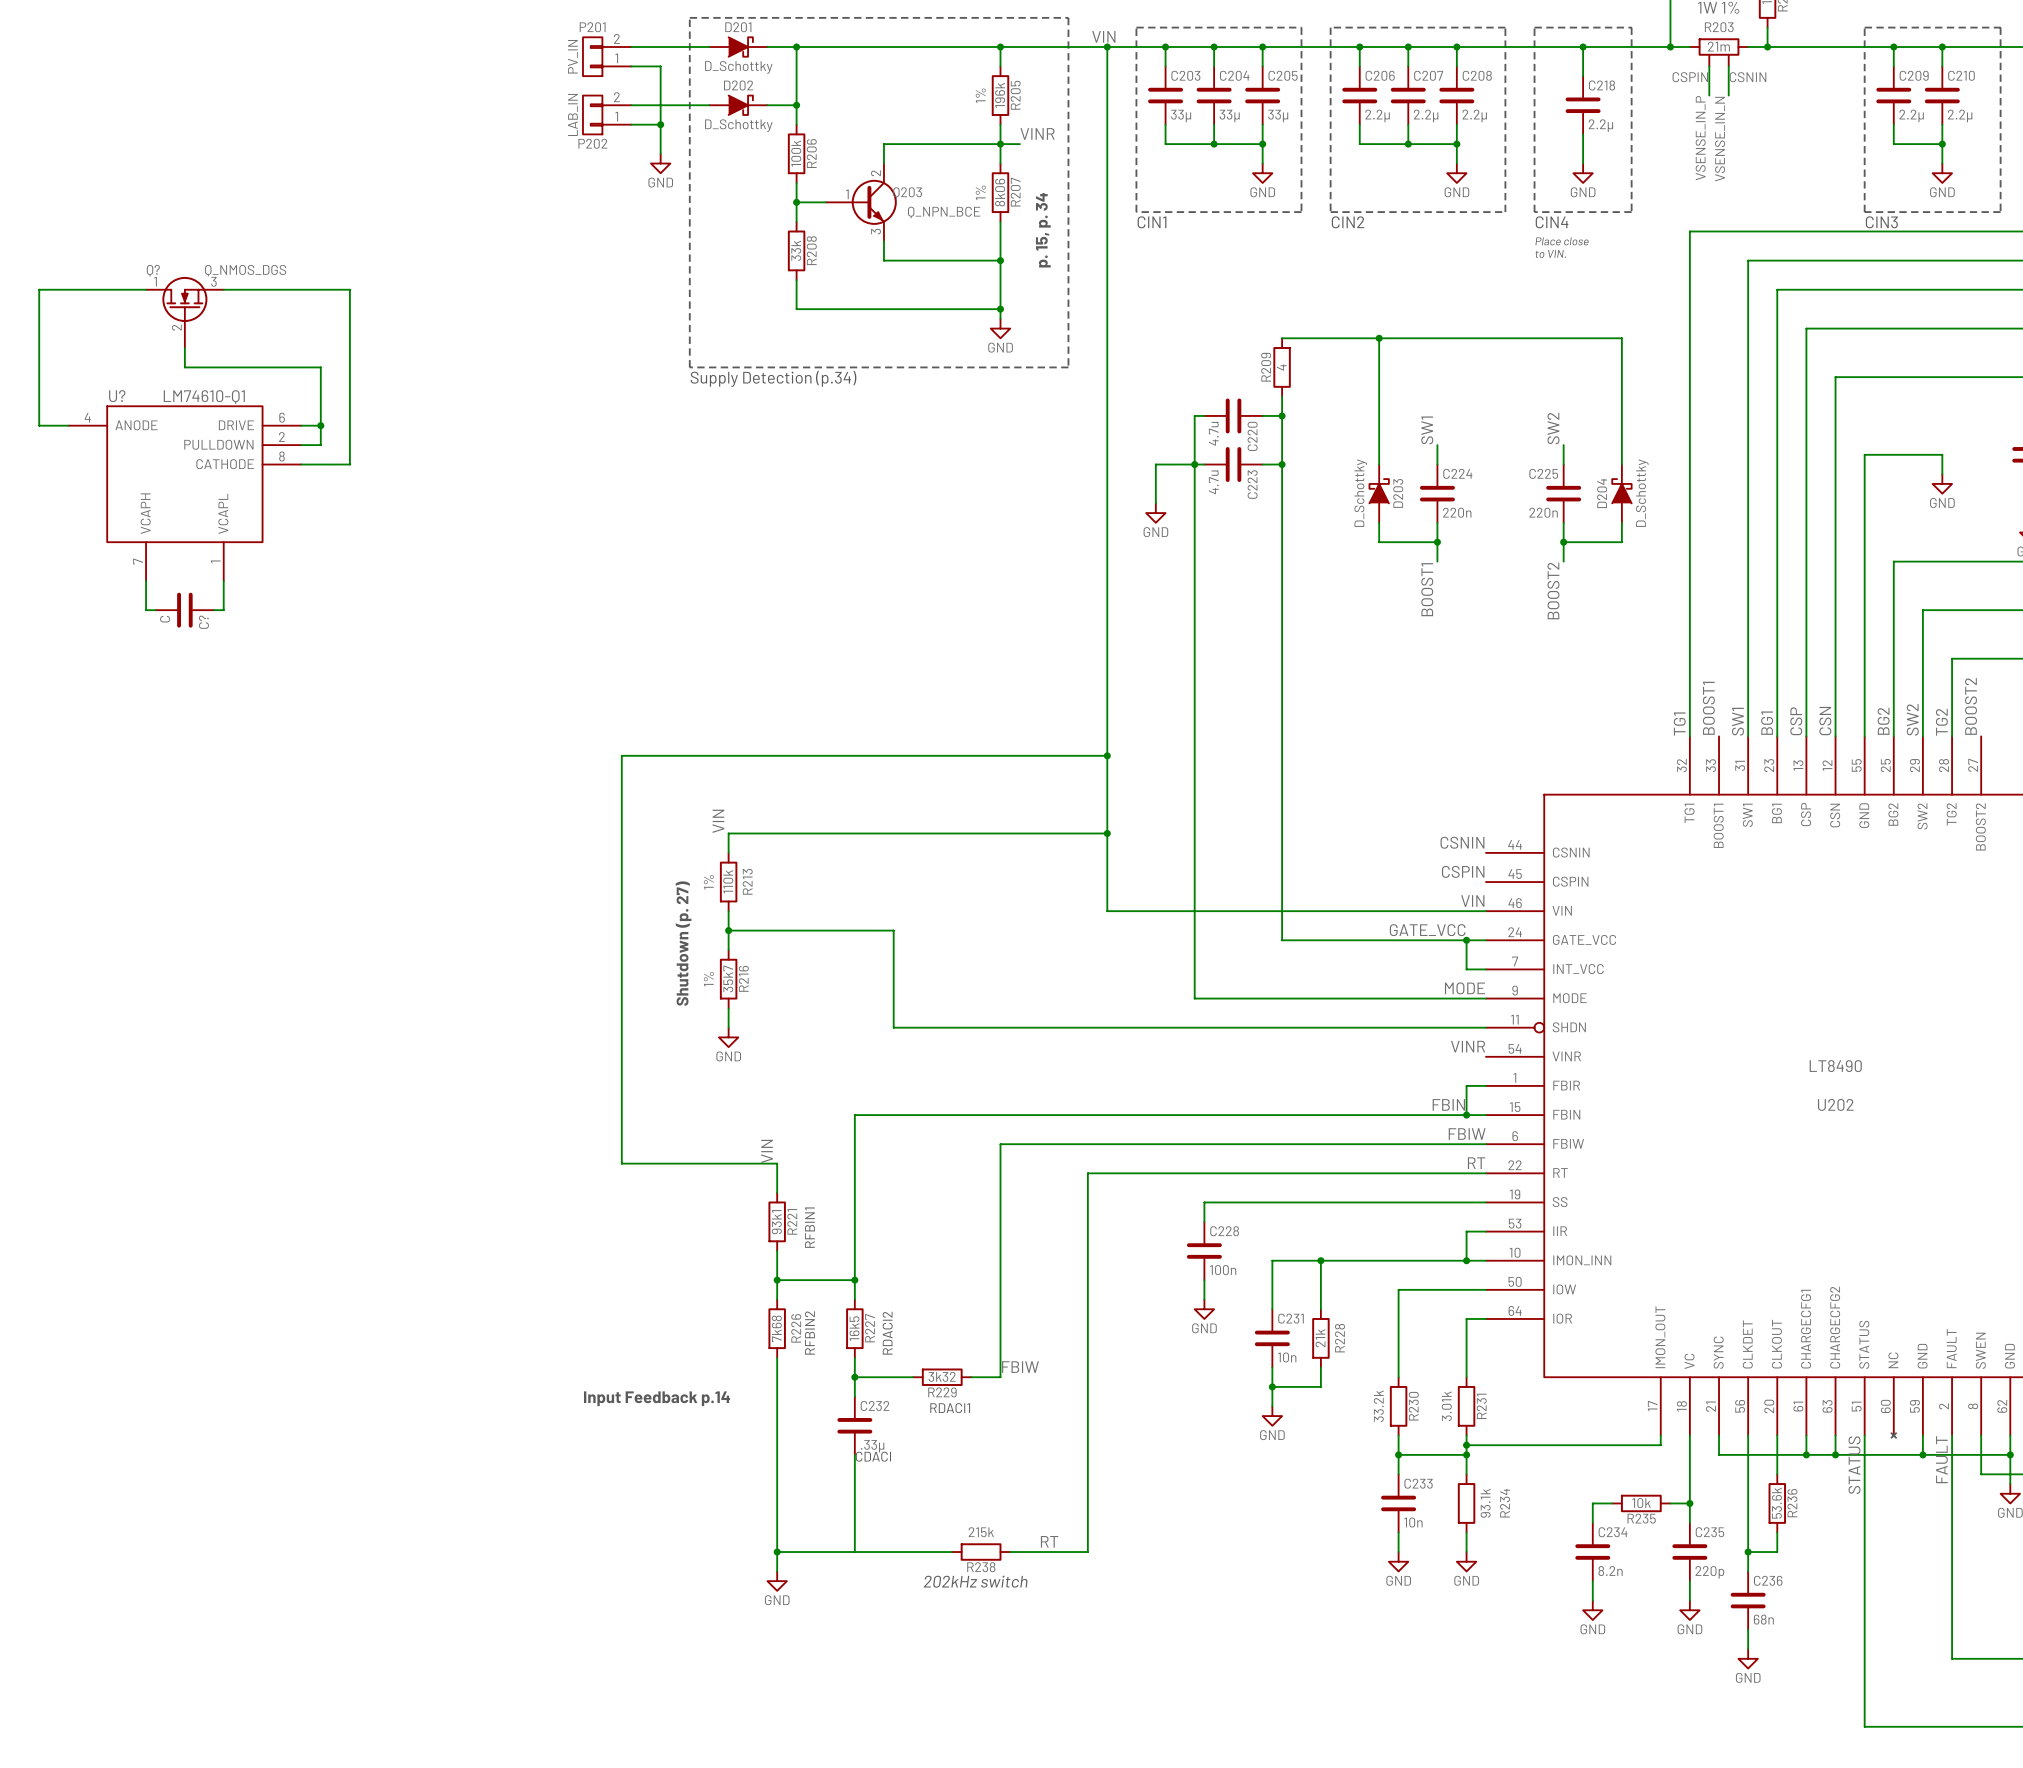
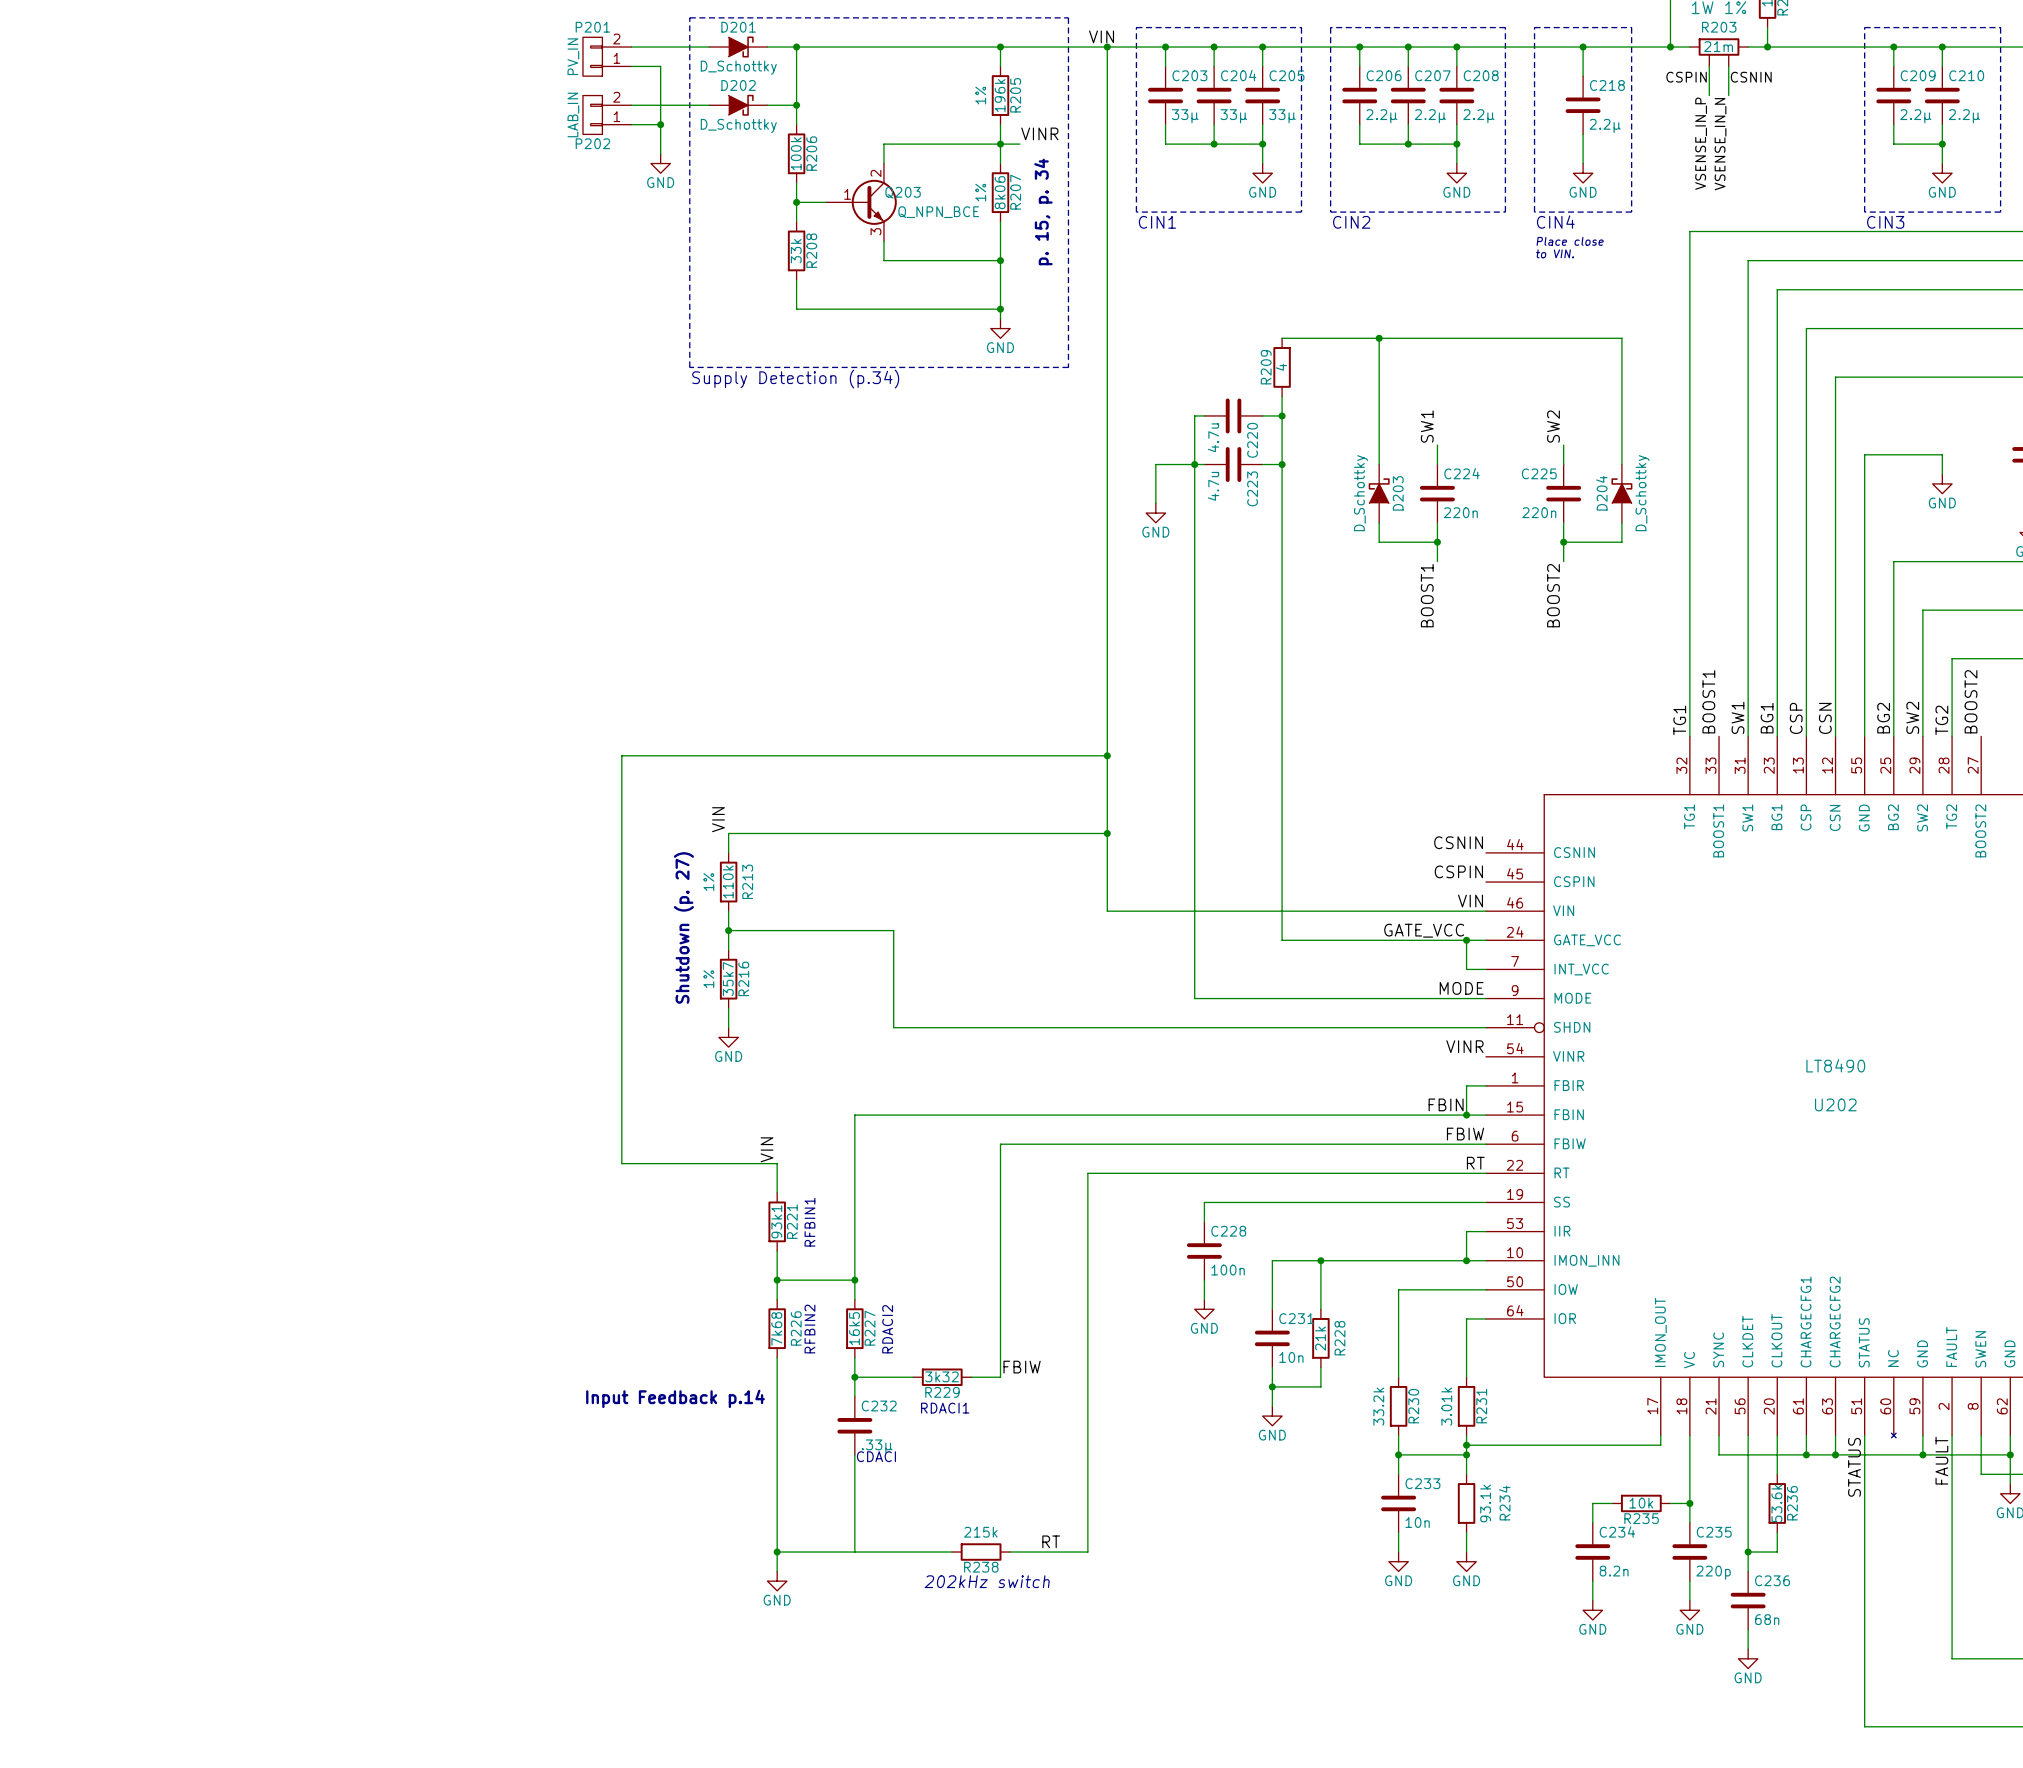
wire: (146, 289) (39, 289) (39, 425) (68, 425) -> none
wire: (223, 289) (349, 289) (349, 464) (301, 464) -> none
Q?: Q_NMOS_DGS (184, 312) -> none
wire: (184, 348) (184, 367) (320, 367) (320, 445) (301, 445) -> none
wire: (301, 425) (320, 425) -> none
junction: (320, 425) -> none
U?: LM74610-Q1 (184, 493) -> none
wire: (146, 581) (146, 610) (155, 610) -> none
wire: (223, 581) (223, 610) (214, 610) -> none
C?: C (184, 610) -> none

